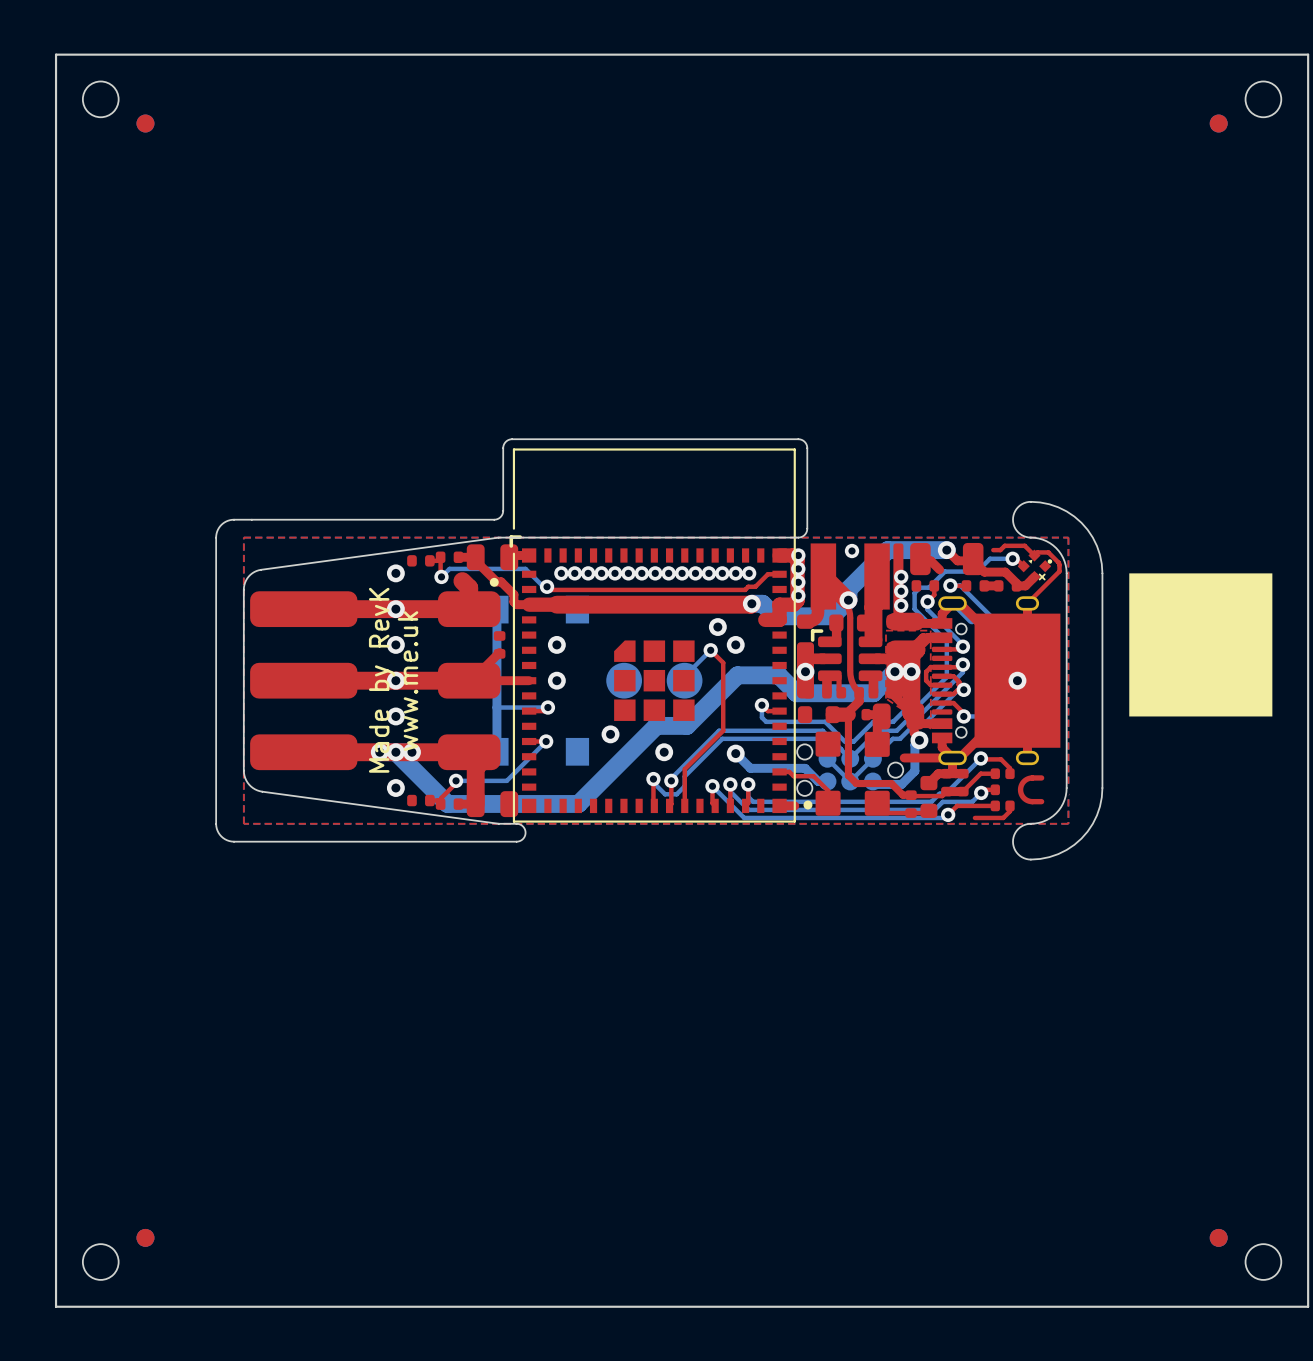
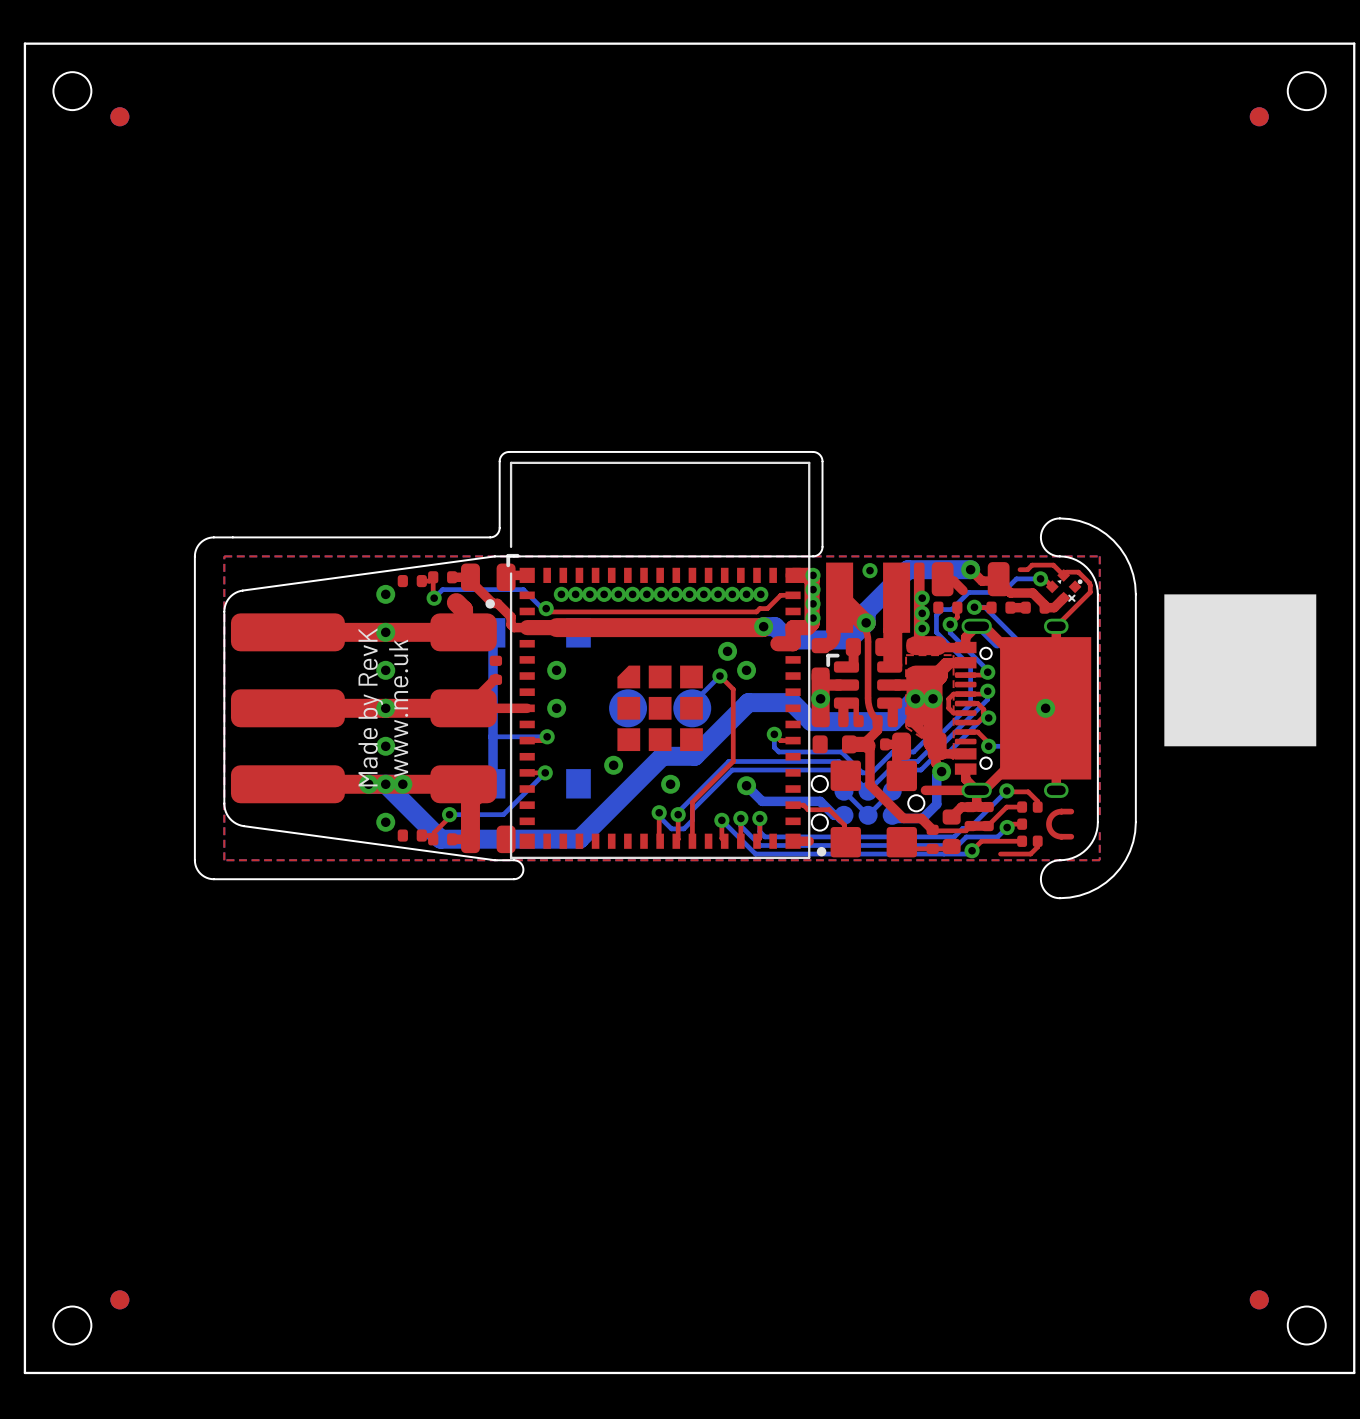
top track: (848, 714) (848, 775) (856, 783) (891, 783) (903, 795) (911, 795) -> (866, 744) (869, 747) (869, 784) (903, 818) (921, 818) (932, 829)
part footprint: [803, 731, 890, 816] -> [816, 760, 917, 858]

